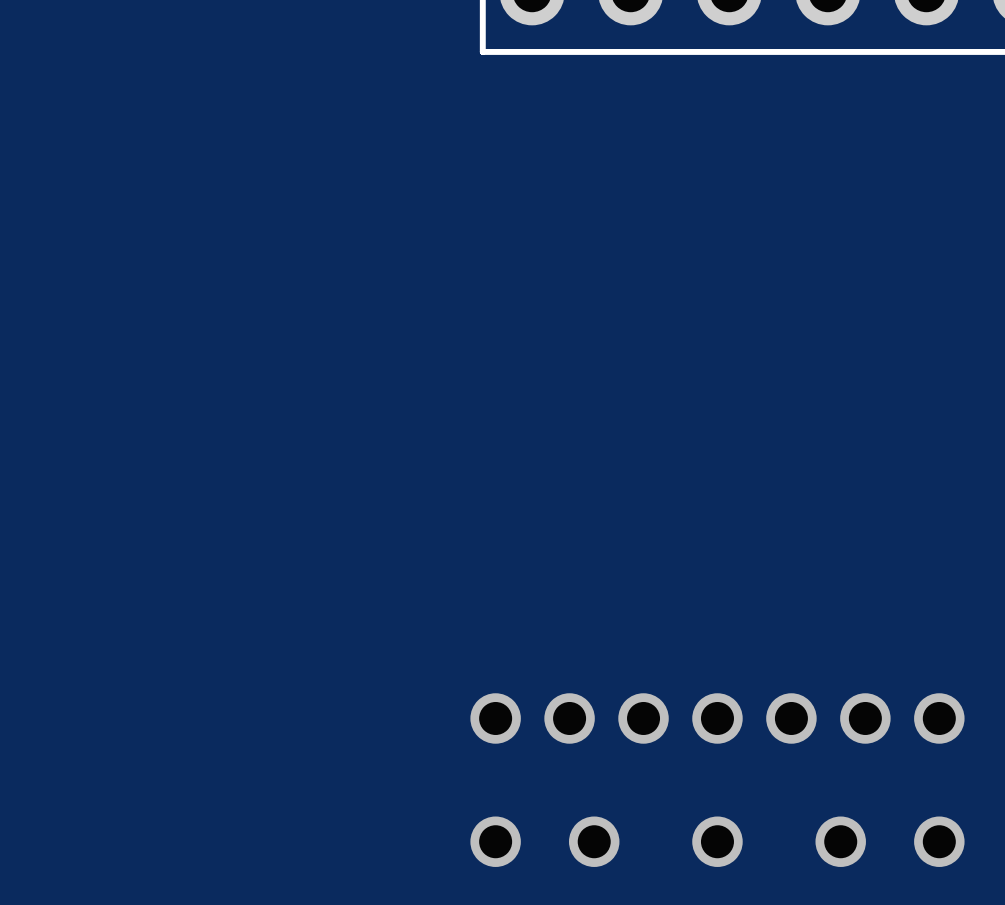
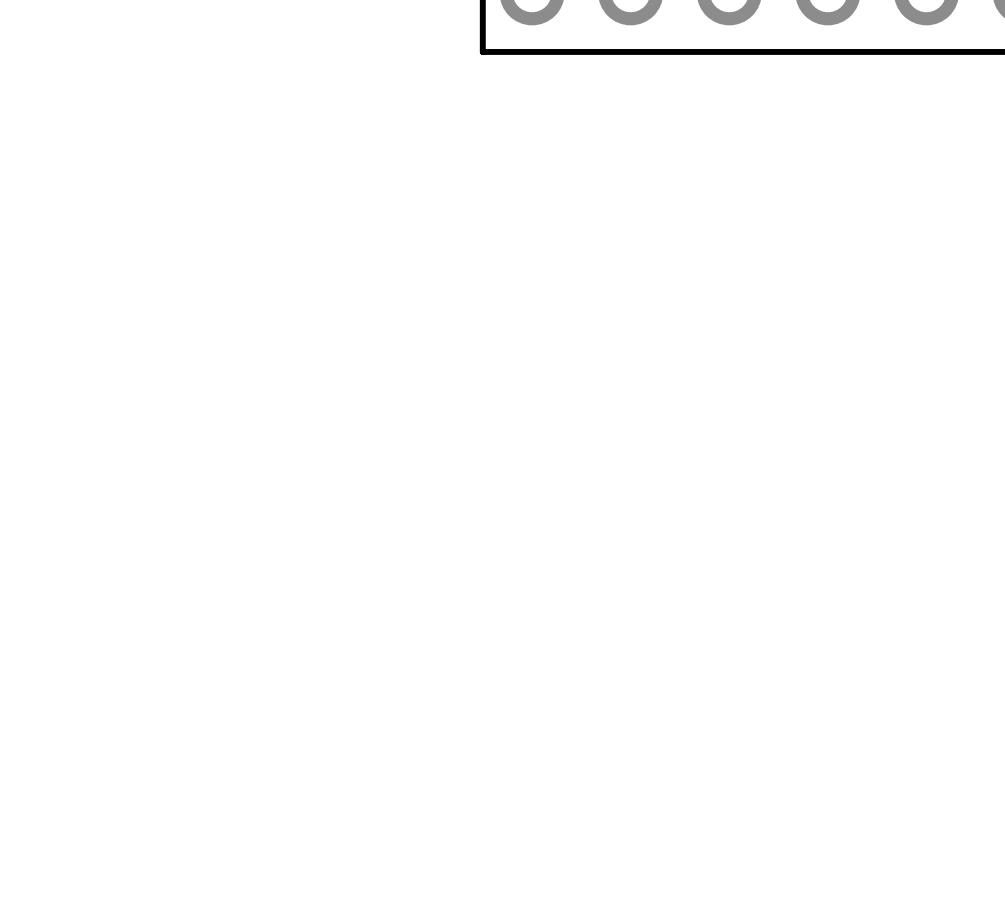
via: (495, 718) -> none
via: (569, 718) -> none
via: (643, 718) -> none
via: (717, 718) -> none
via: (791, 718) -> none
via: (865, 718) -> none
via: (939, 718) -> none
via: (495, 841) -> none
via: (594, 841) -> none
via: (717, 841) -> none
via: (840, 841) -> none
via: (939, 841) -> none

